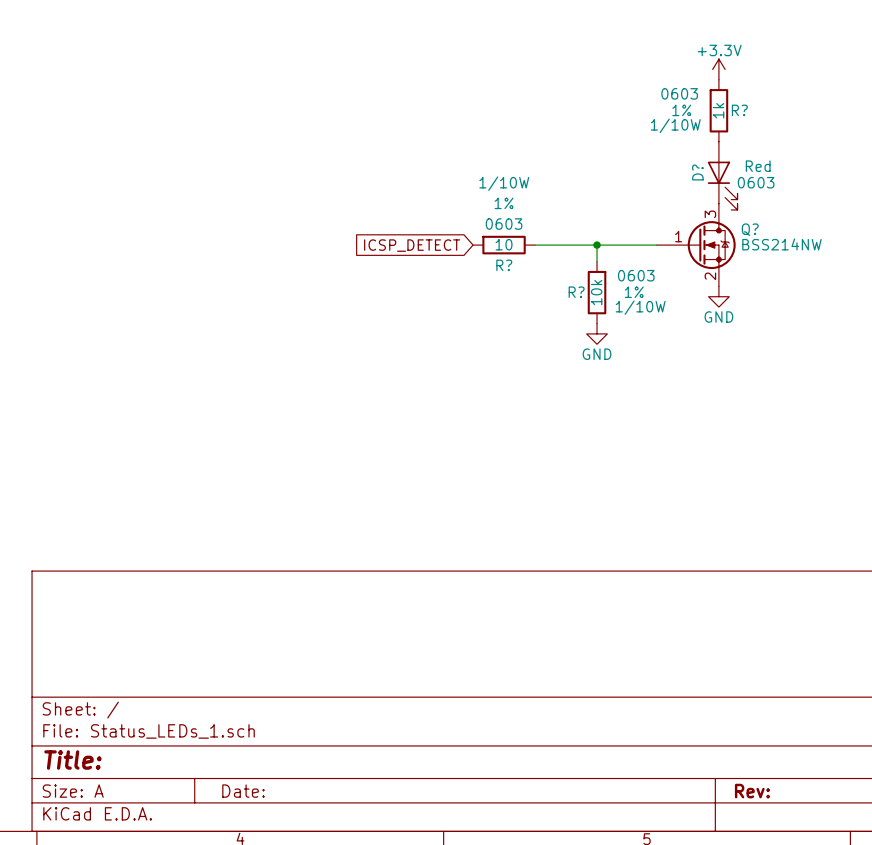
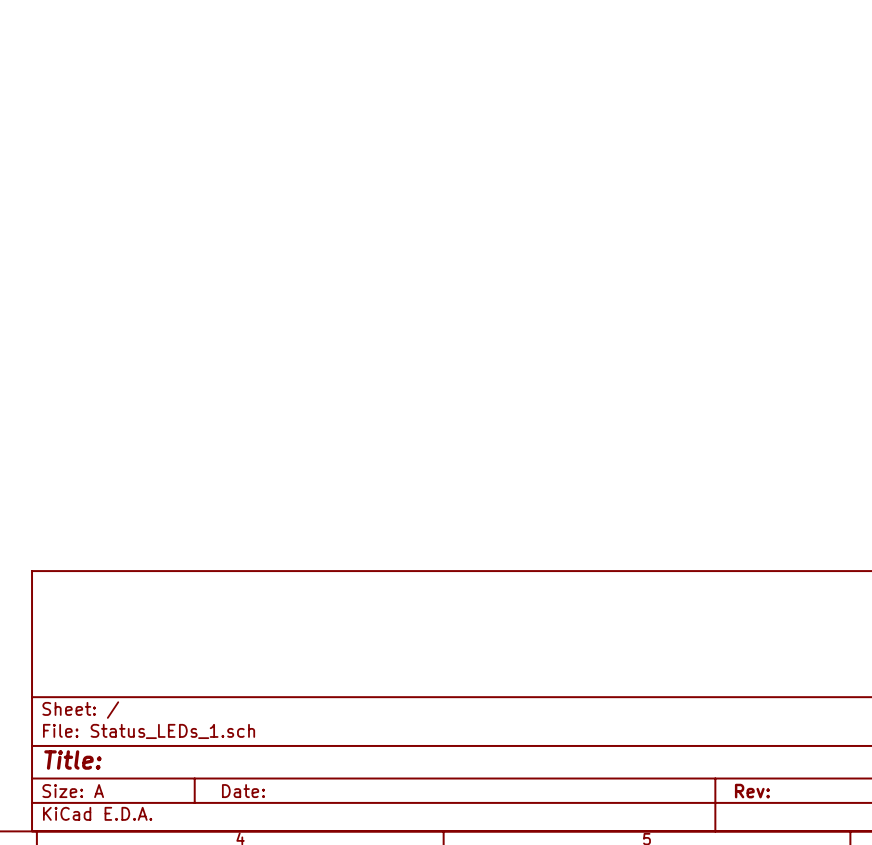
power symbol: +3.3V (718, 69) -> none
R?: 1k (718, 110) -> none
D?: Red (722, 175) -> none
global label: ICSP_DETECT (412, 245) -> none
R?: 10 (504, 245) -> none
wire: (535, 245) (656, 245) -> none
wire: (597, 245) (597, 261) -> none
junction: (597, 245) -> none
Q?: BSS214NW (696, 245) -> none
R?: 10k (597, 292) -> none
power symbol: GND (718, 296) -> none
power symbol: GND (597, 333) -> none

